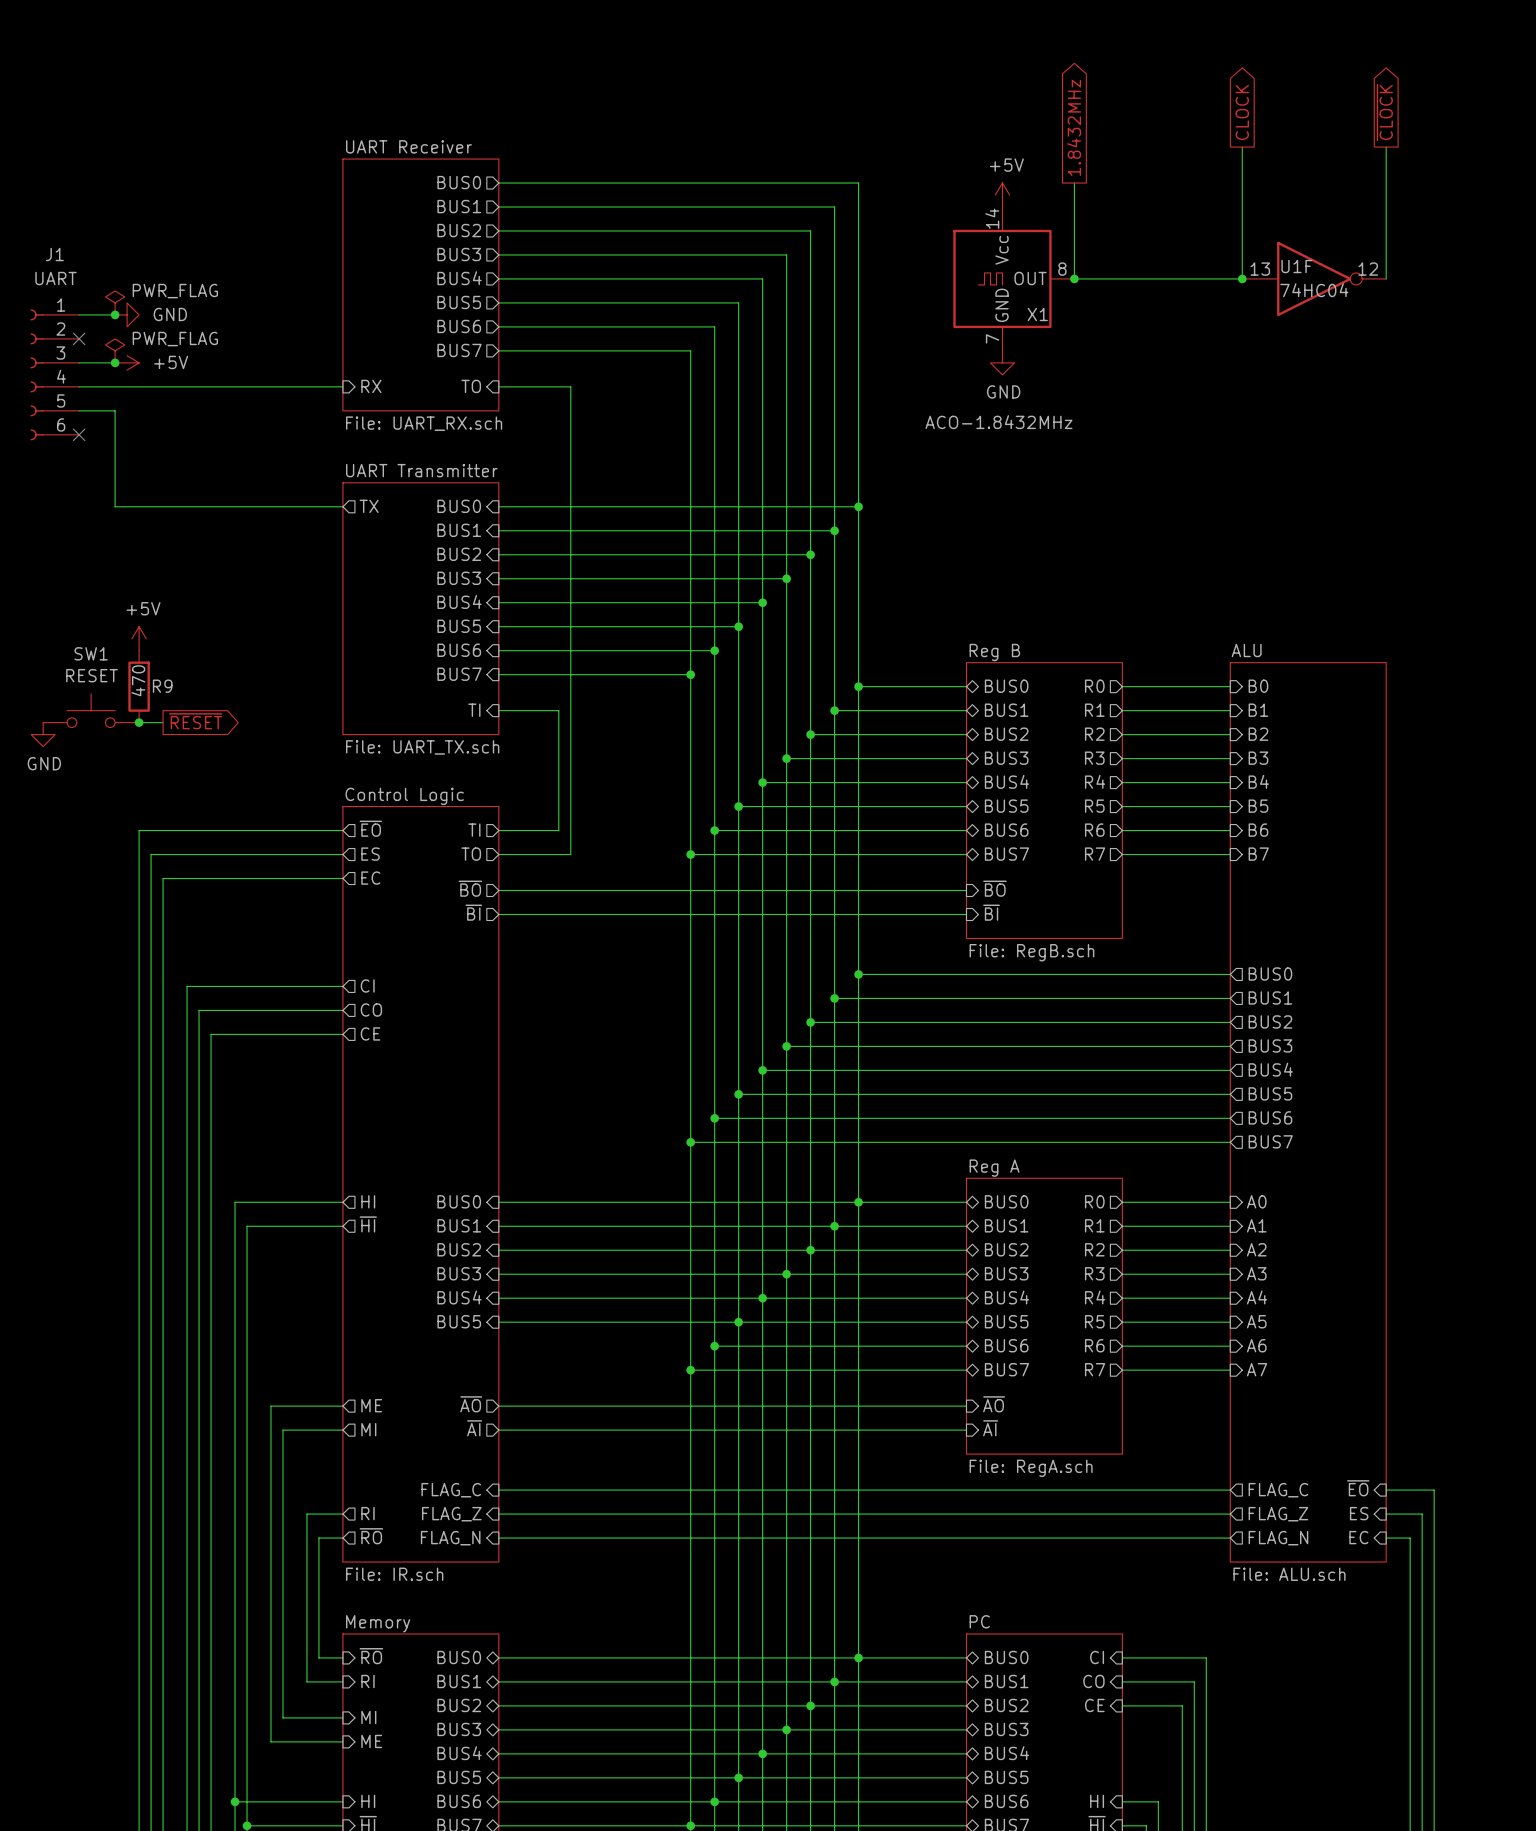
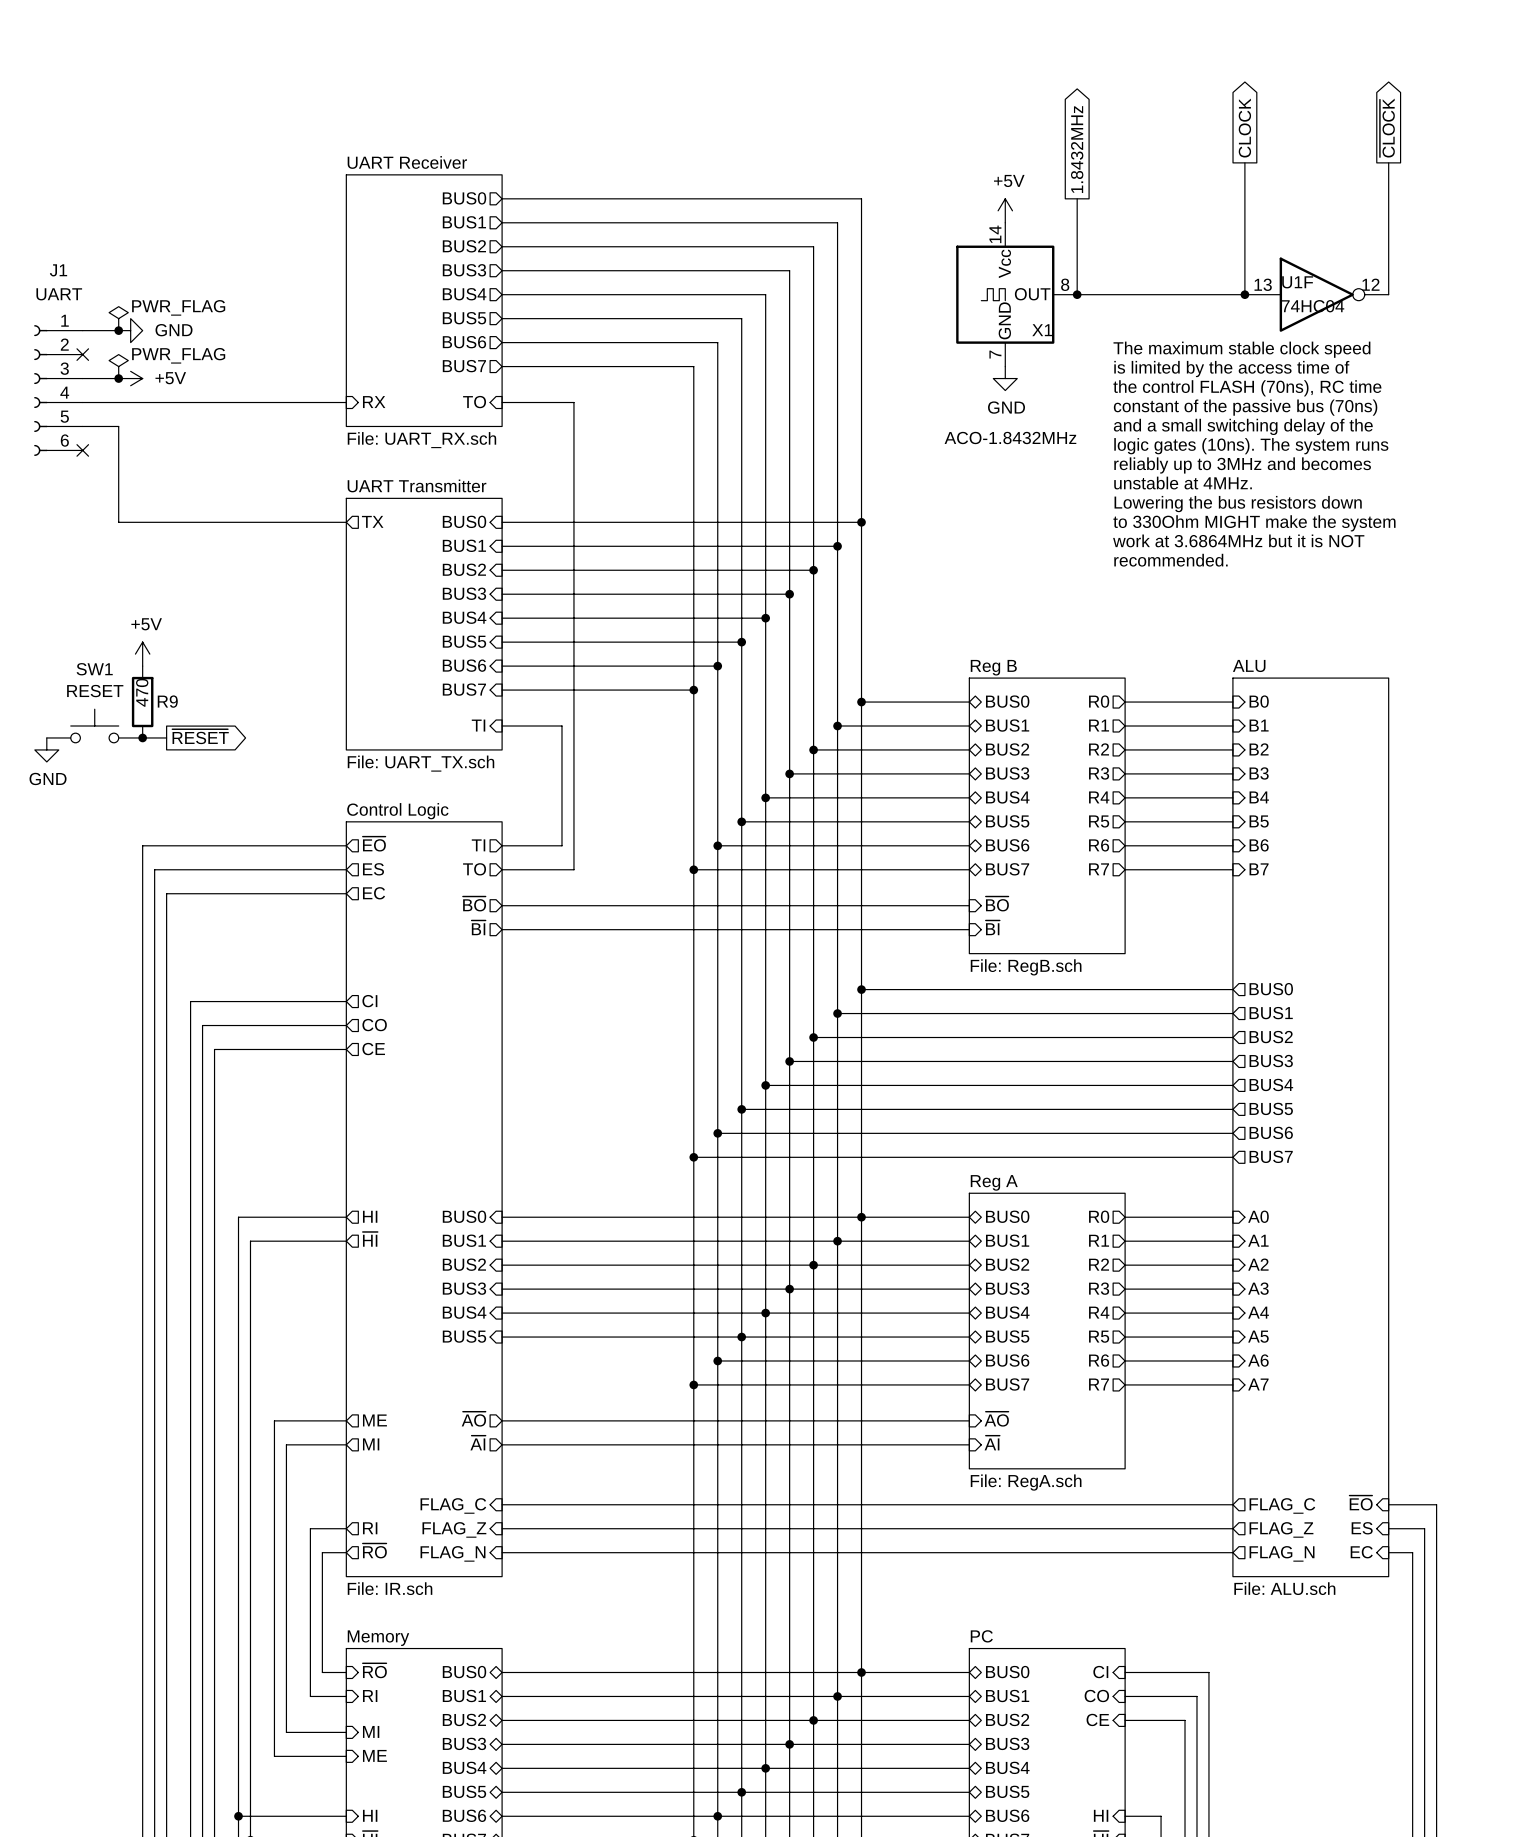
text: none -> The maximum stable clock speed (1241, 349)
text: none -> is limited by the access time of (1231, 369)
text: none -> the control FLASH (70ns), RC time (1247, 388)
text: none -> constant of the passive bus (70ns) (1245, 407)
text: none -> and a small switching delay of the (1243, 426)
text: none -> logic gates (10ns). The system runs (1251, 446)
text: none -> reliably up to 3MHz and becomes (1242, 465)
text: none -> unstable at 4MHz. (1183, 483)
text: none -> Lowering the bus resistors down (1238, 504)
text: none -> to 330Ohm MIGHT make the system (1254, 523)
text: none -> work at 3.6864MHz but it is NOT (1238, 540)
text: none -> recommended. (1170, 560)

